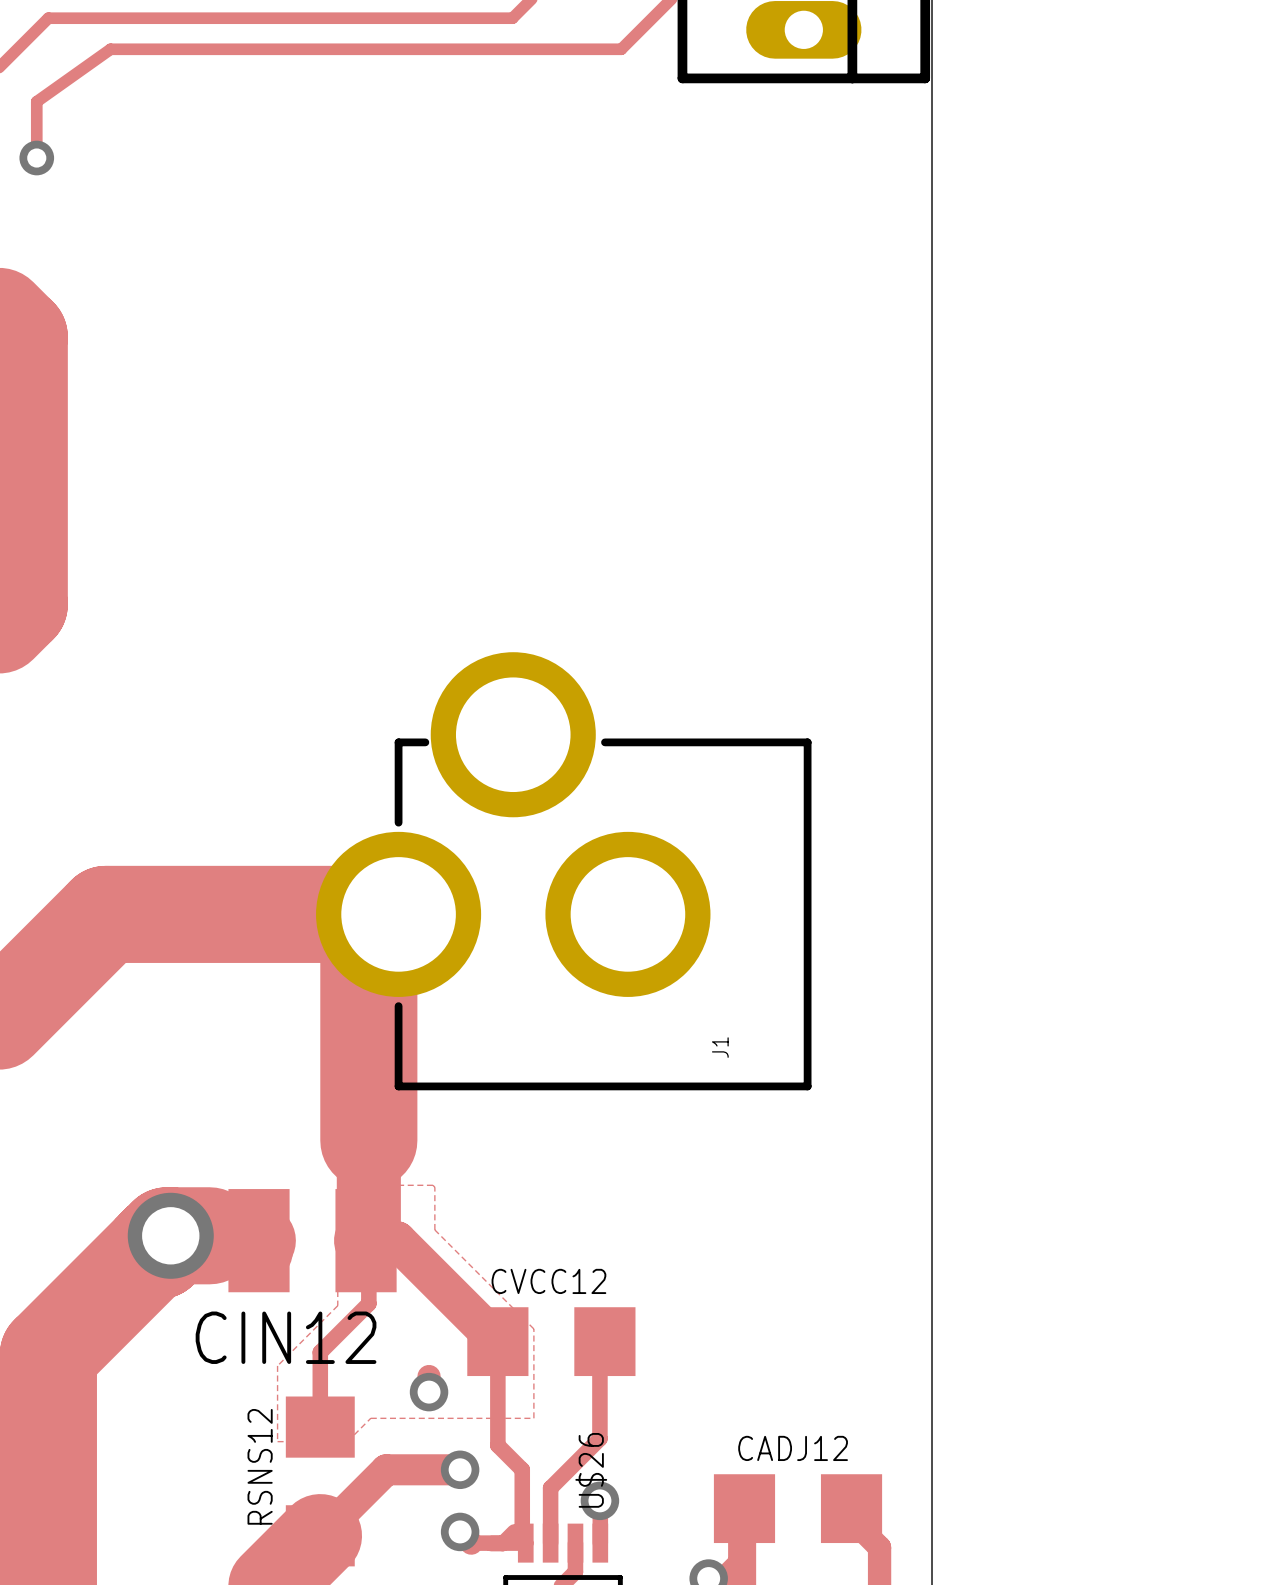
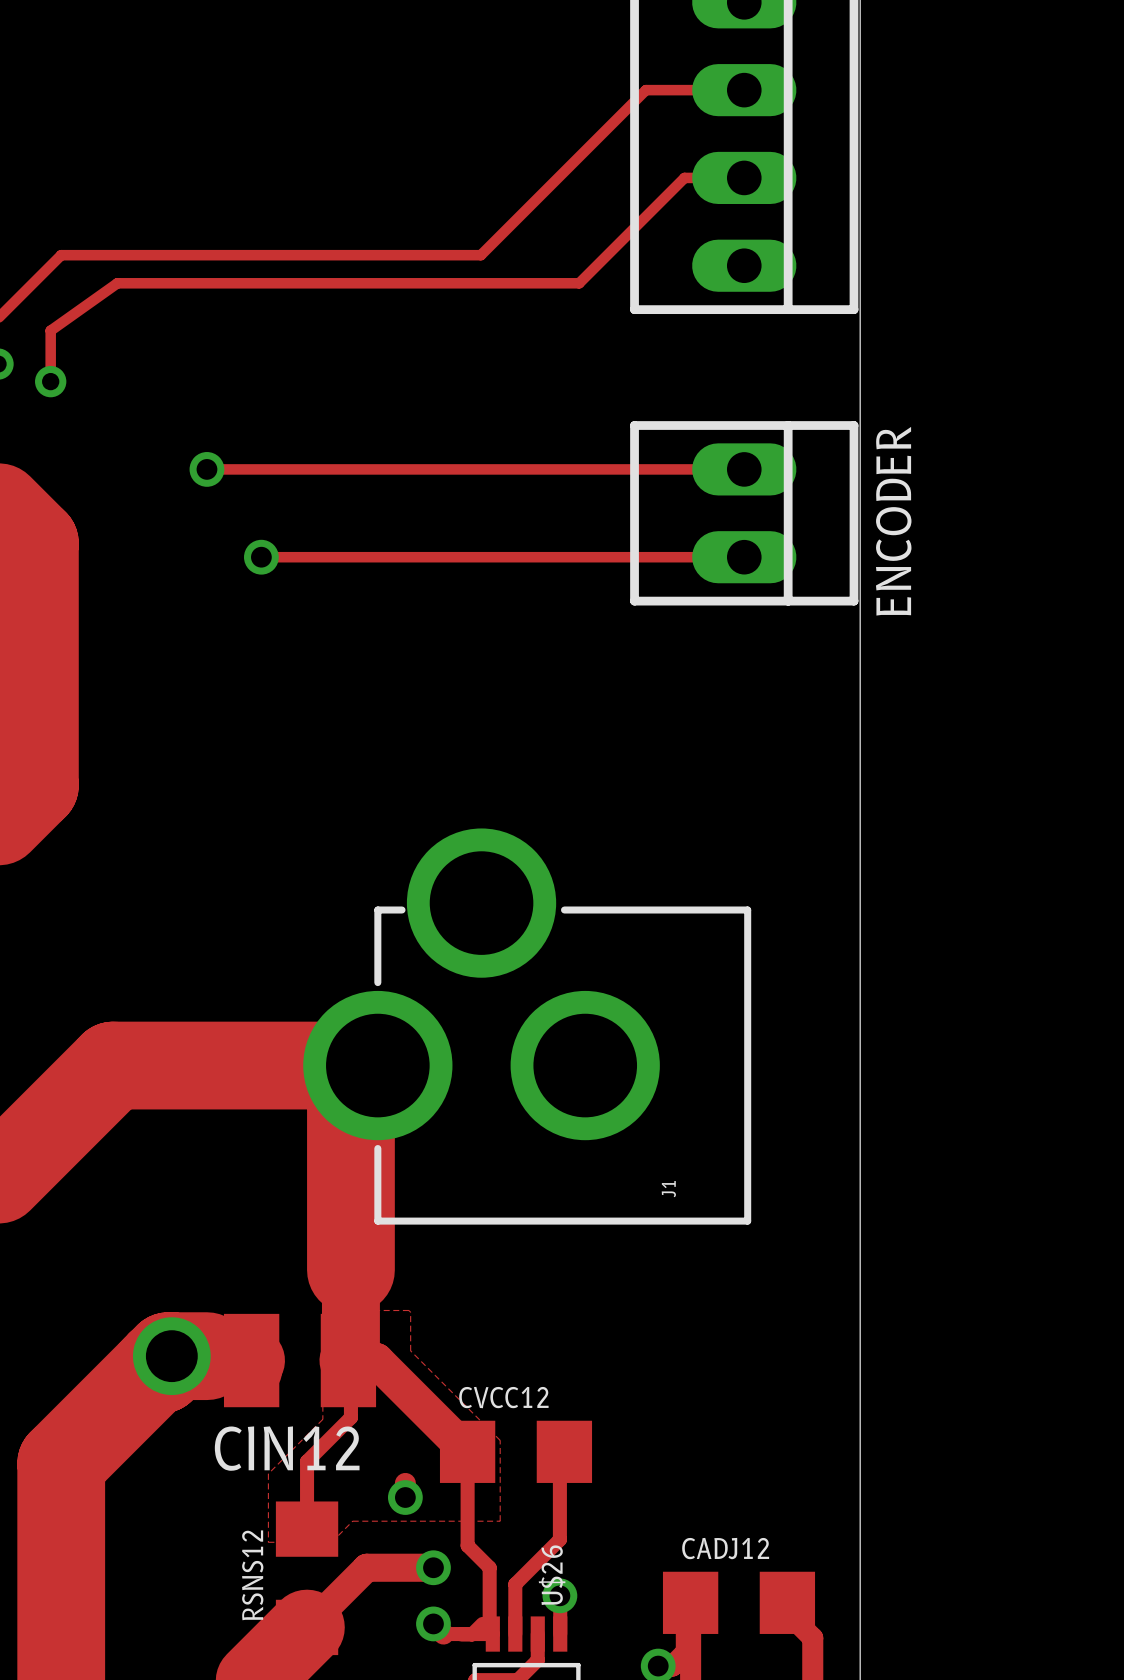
track: none -> (206, 469) (744, 469)
via: none -> (206, 469)
ENCODER: none -> (744, 513)
track: none -> (261, 557) (744, 557)
via: none -> (261, 557)

